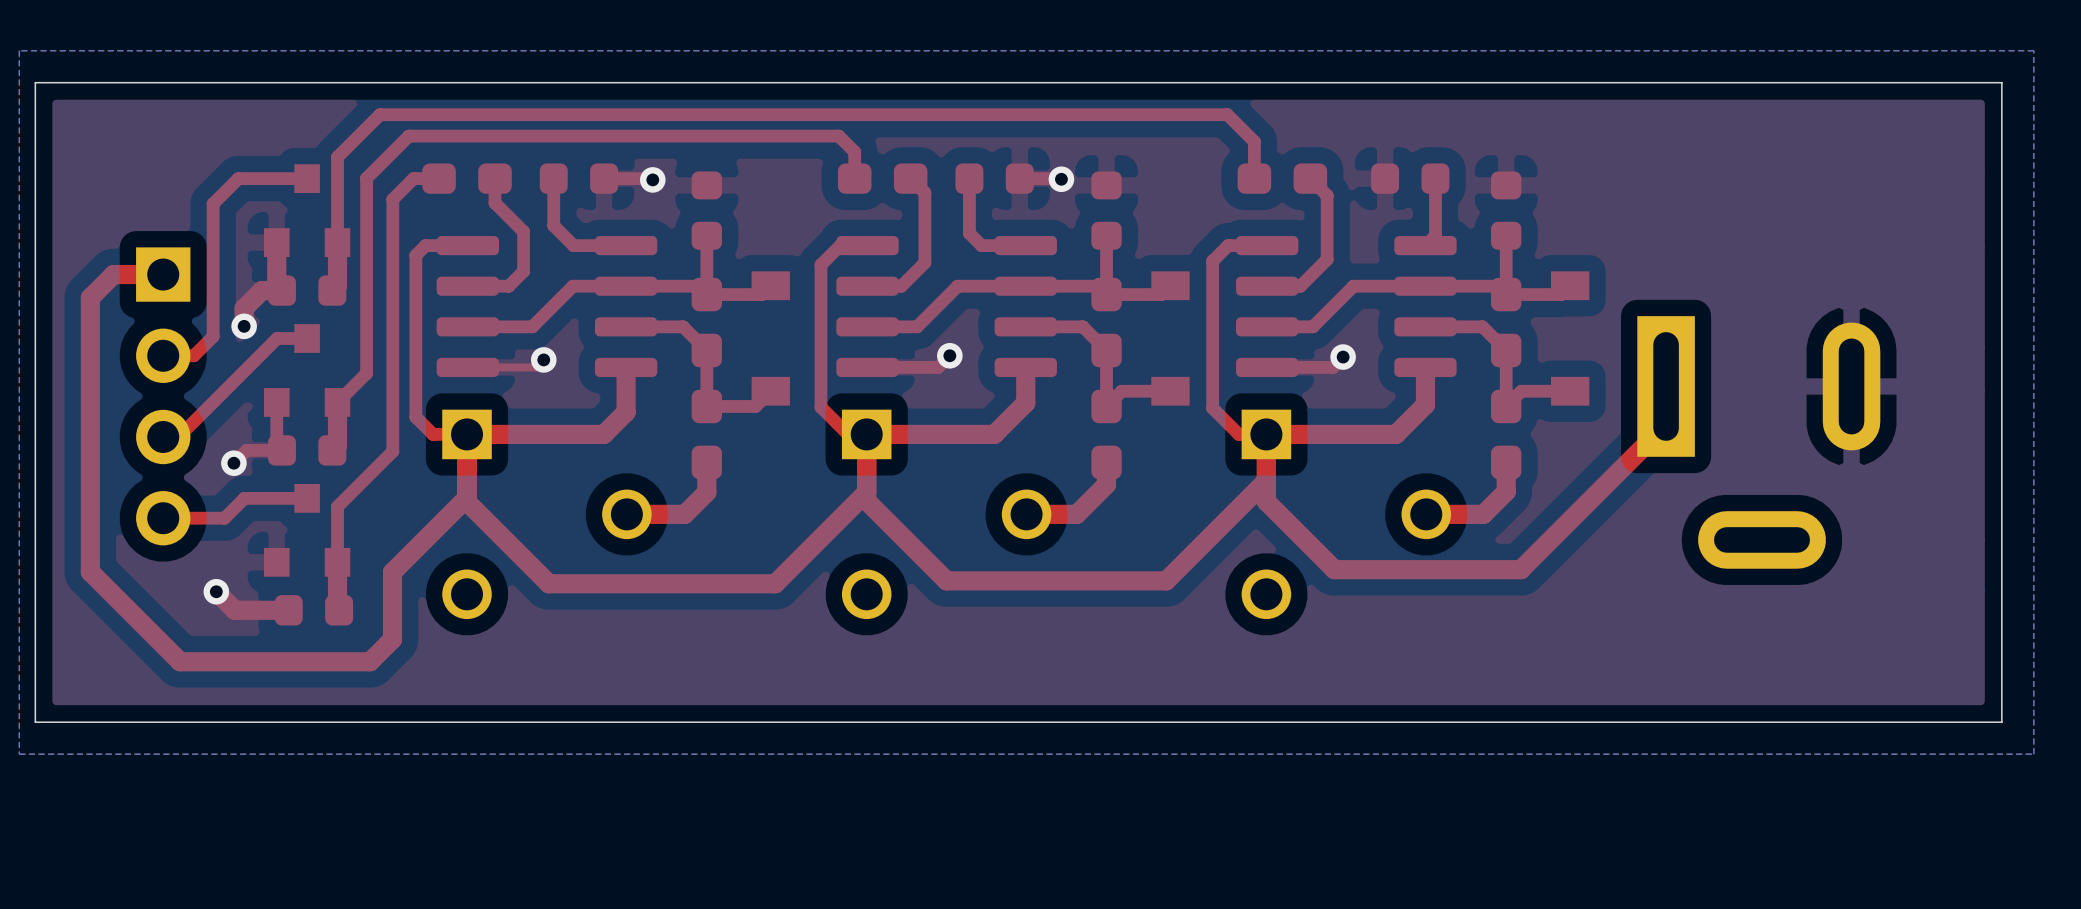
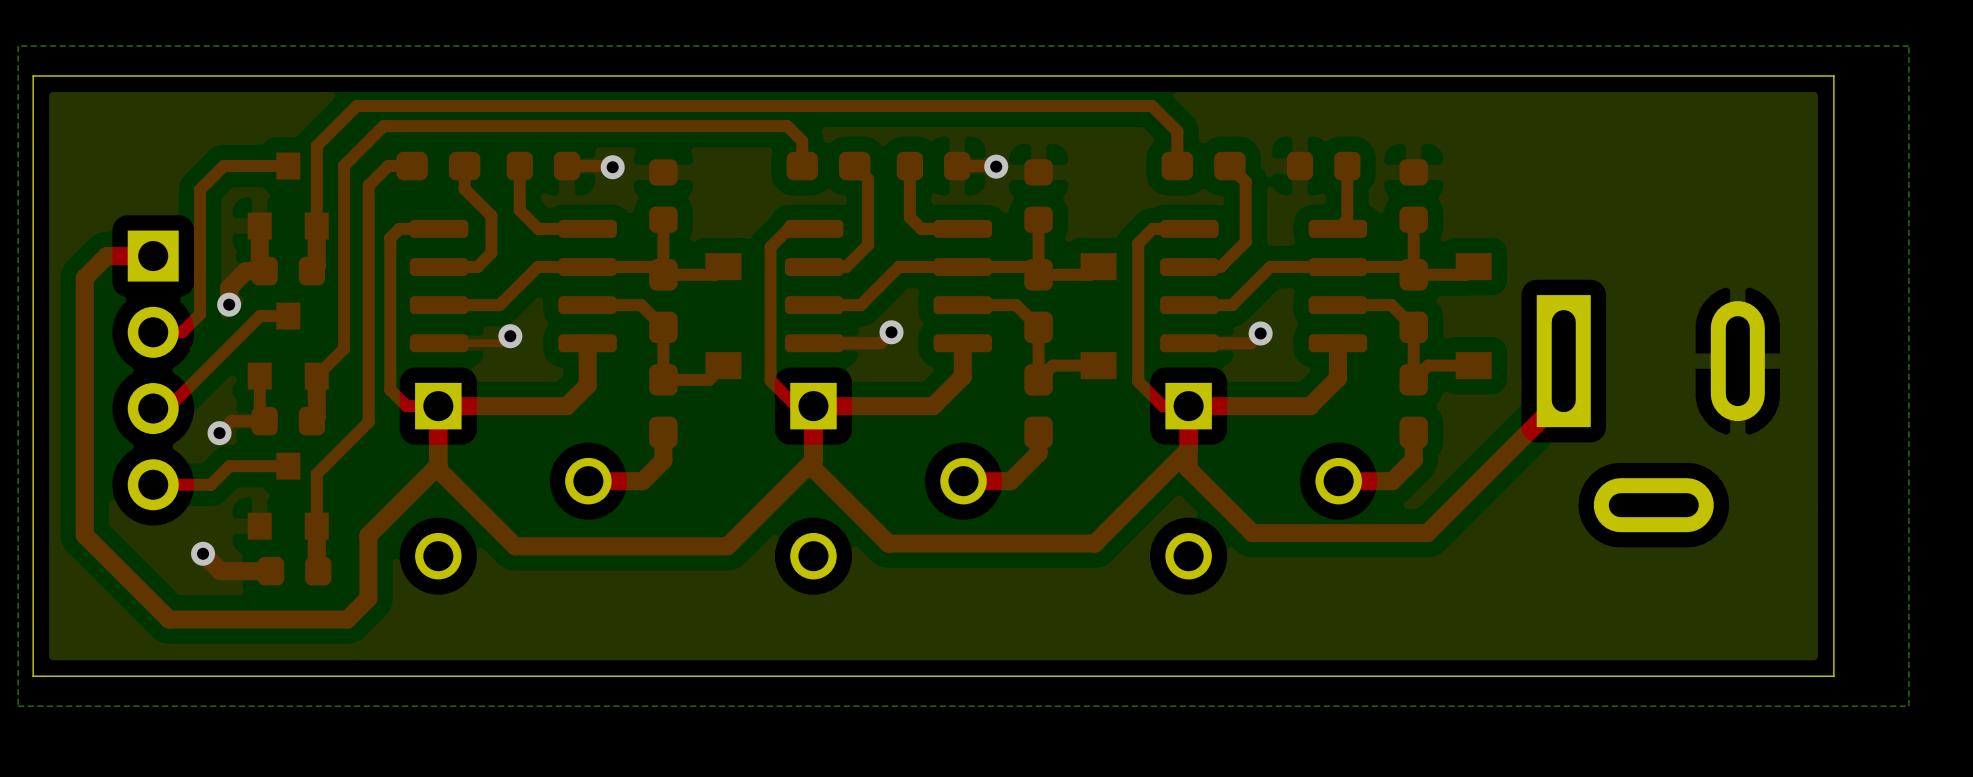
board edge: (1953, 82) (2001, 82) (2001, 722) (1953, 722) -> (1833, 76) (1833, 676)

